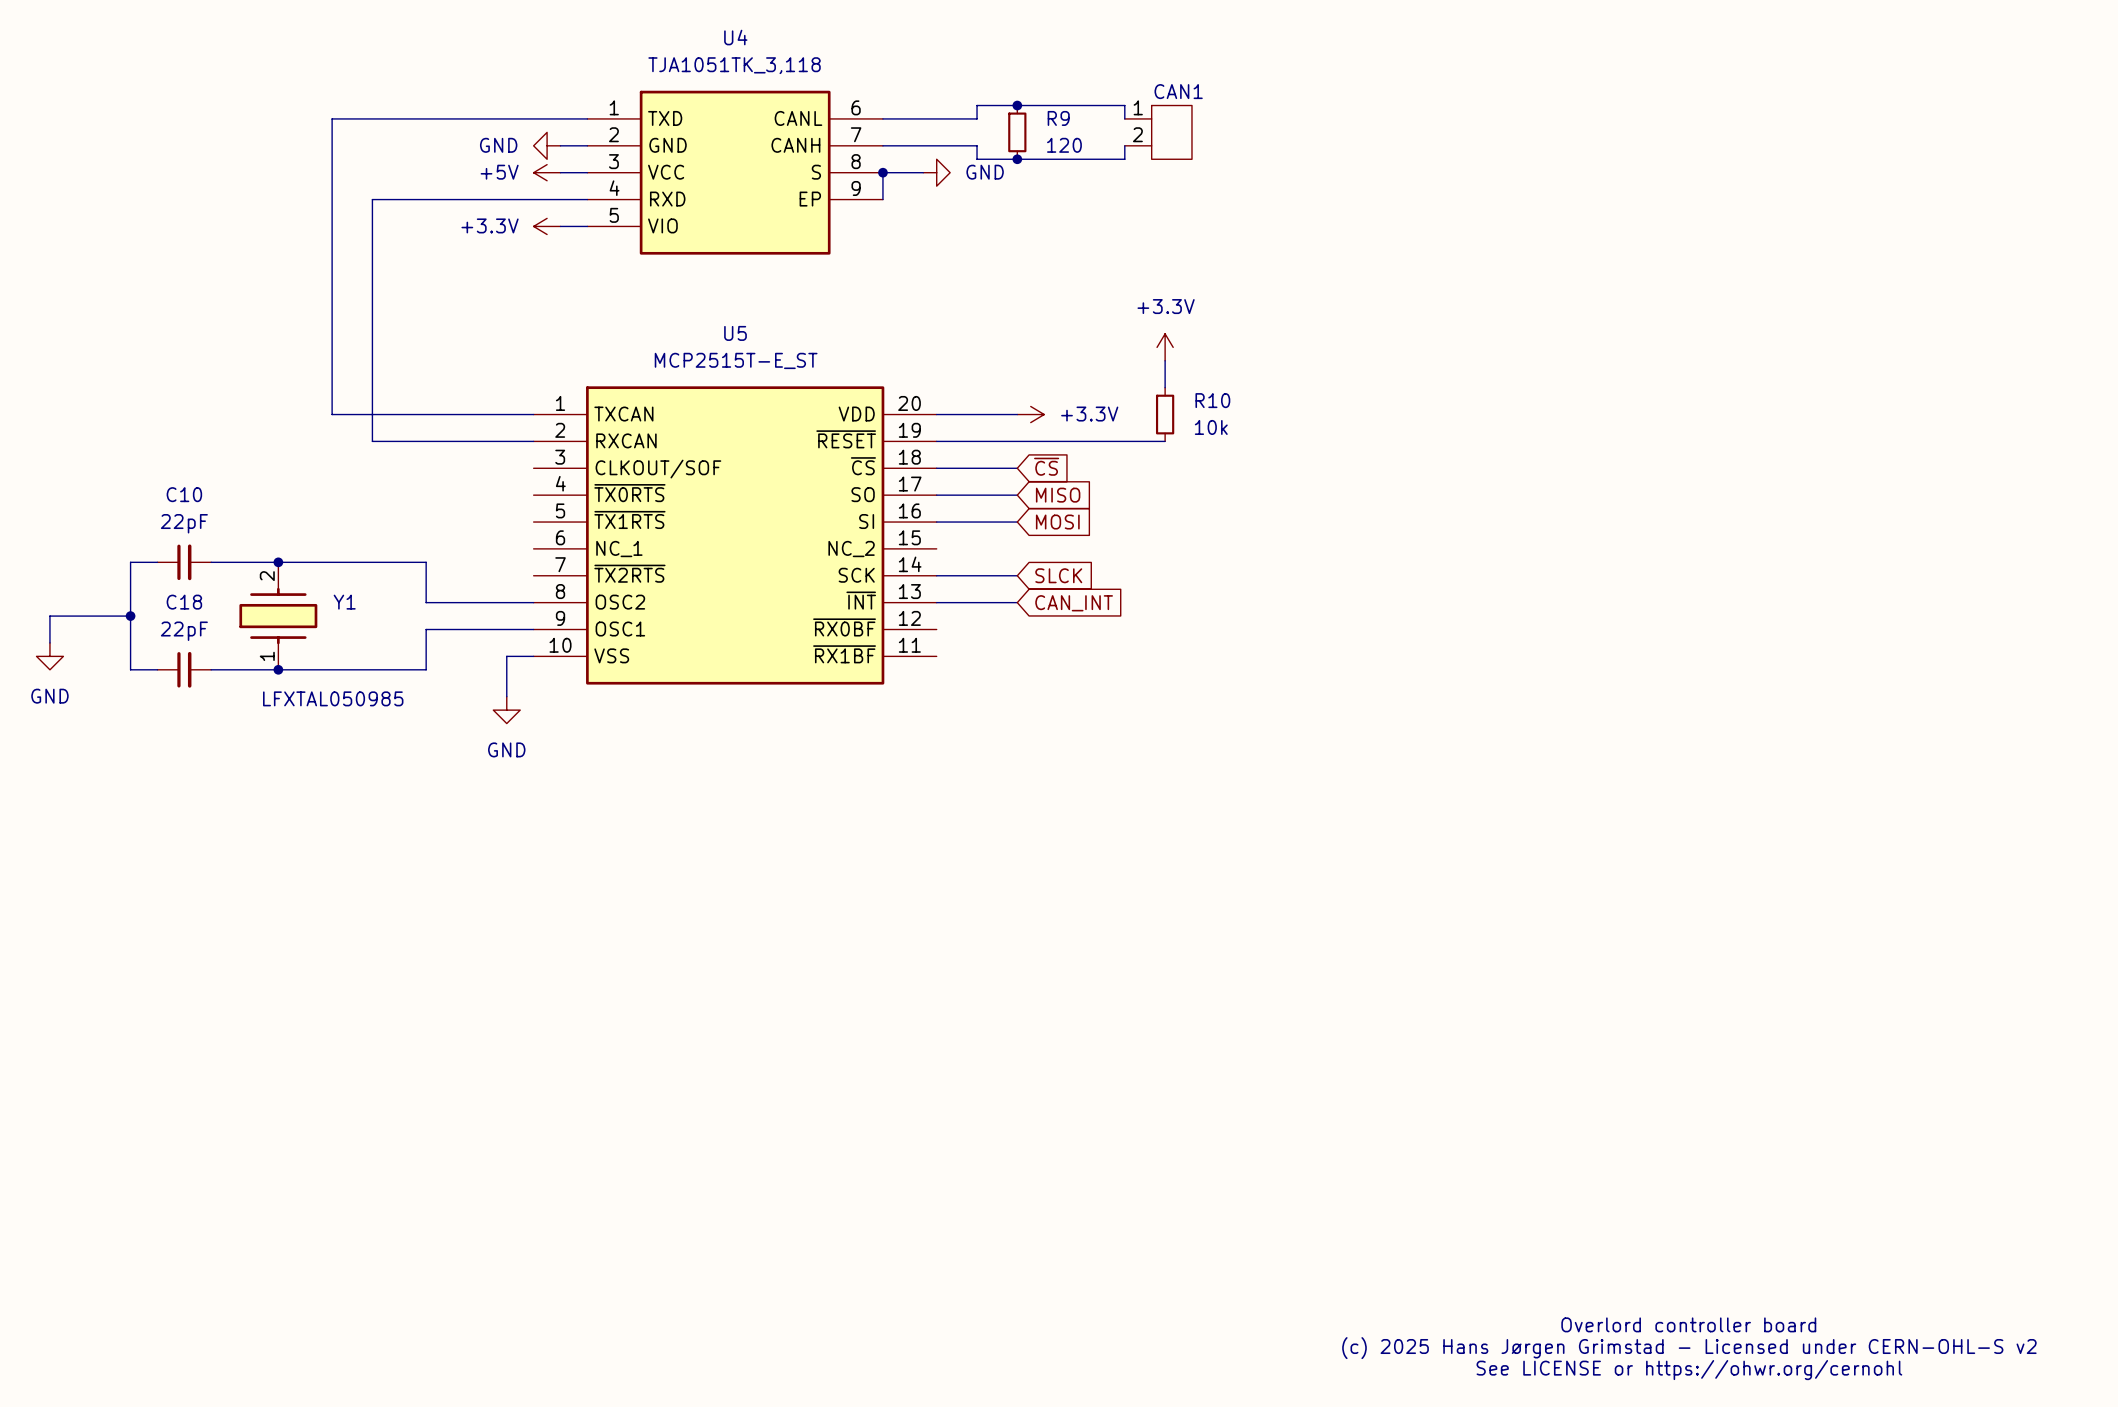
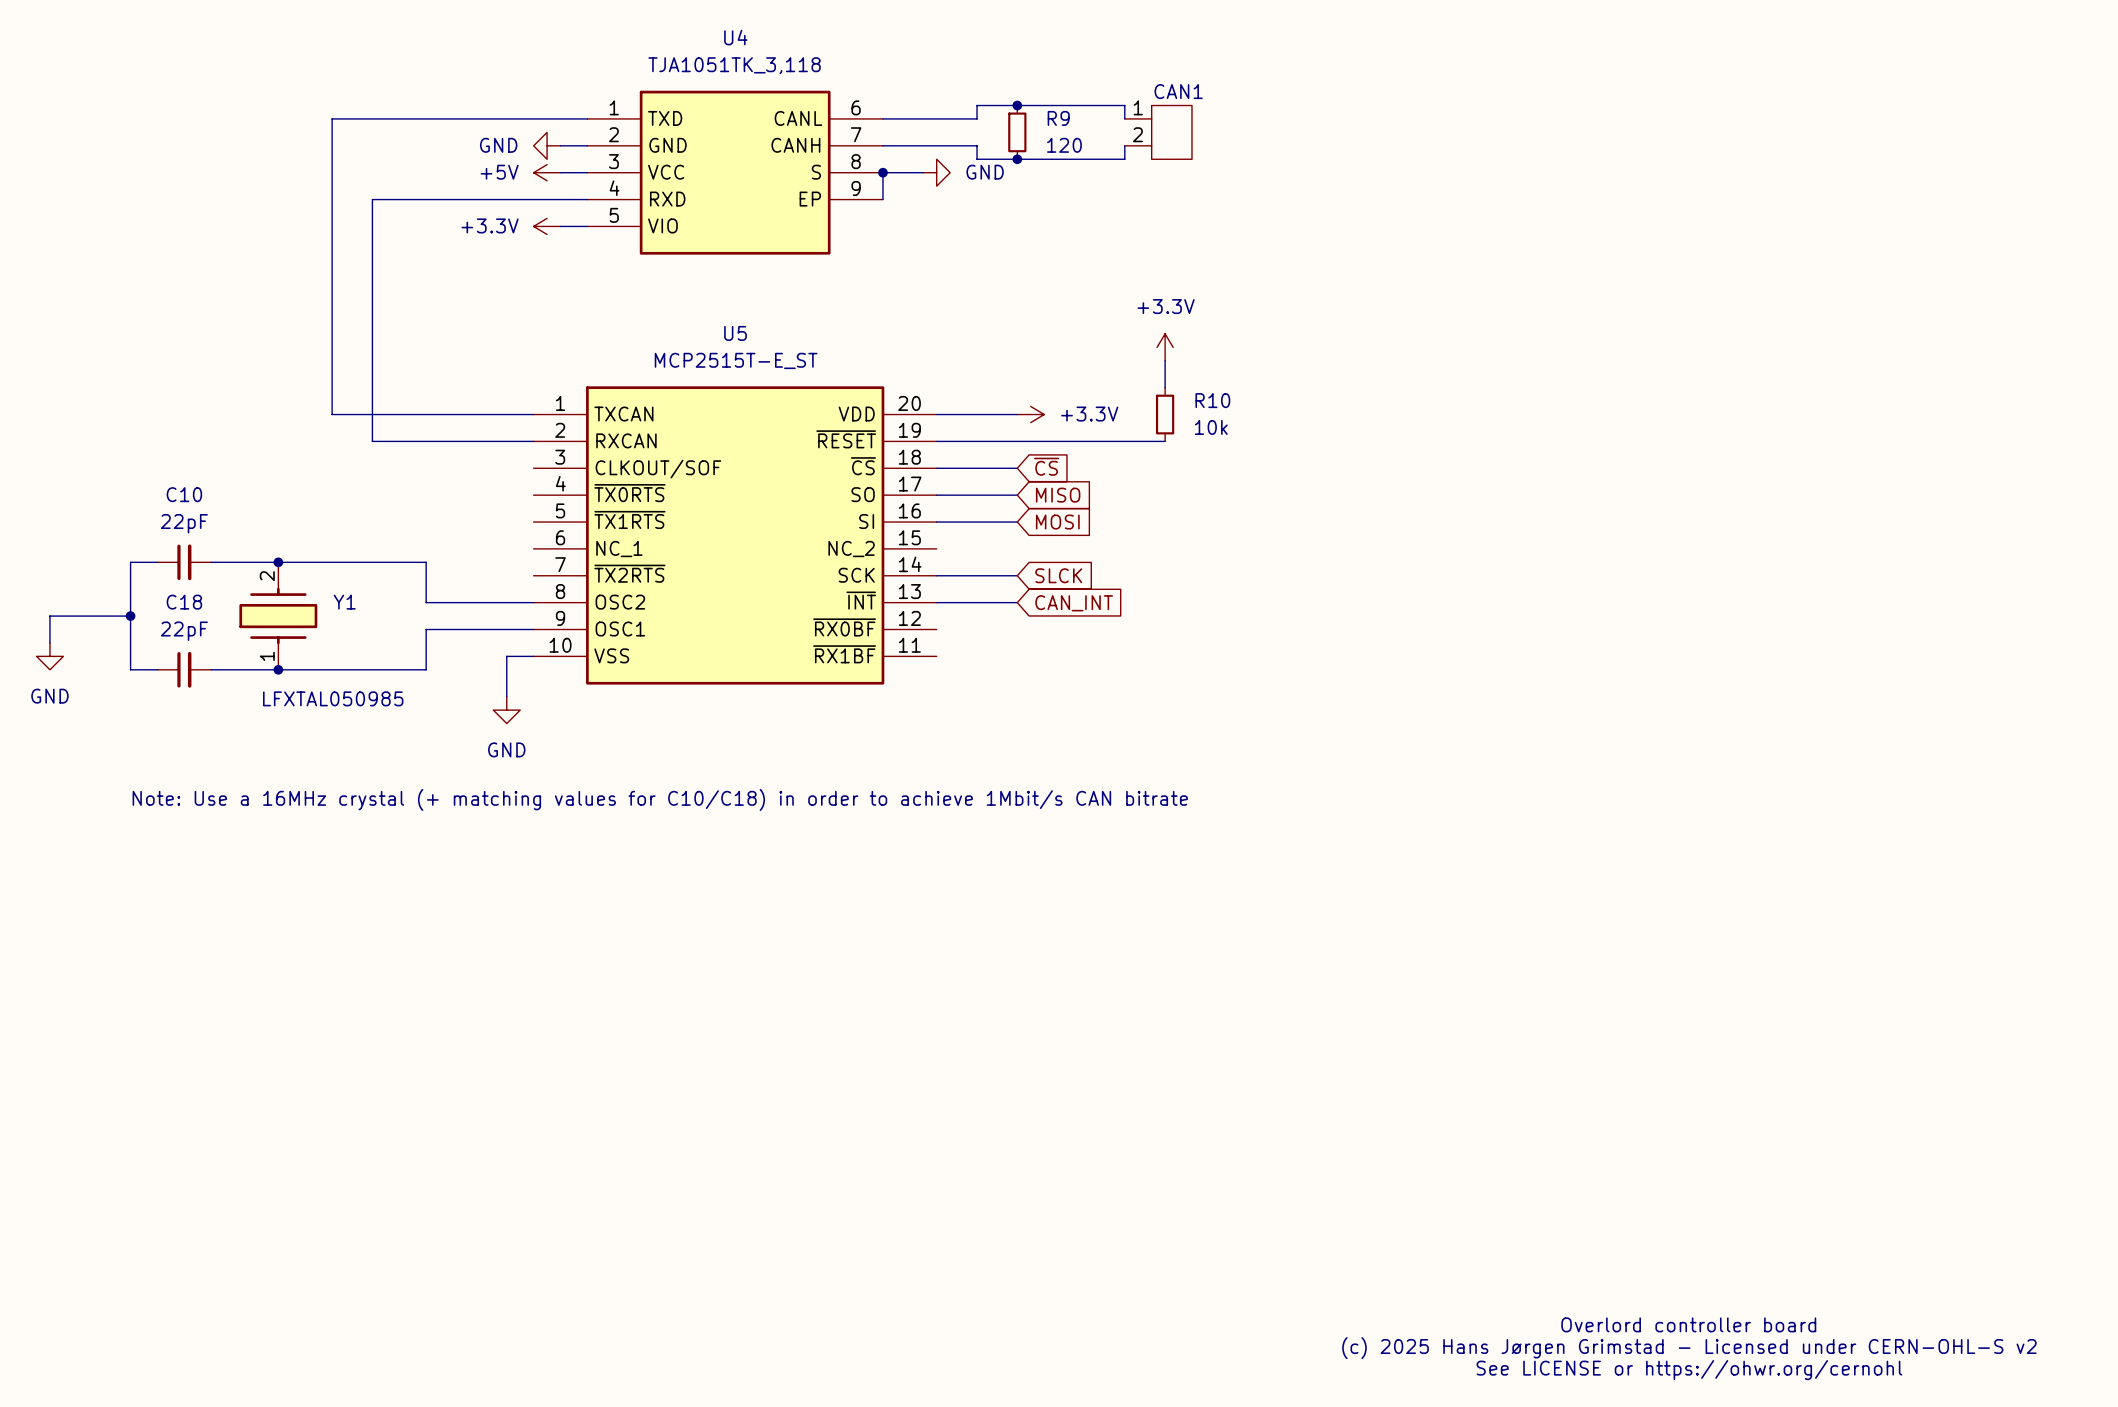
text: none -> Note: Use a 16MHz crystal (+ matching values for C10/C18) in order to achieve 1Mbit/s CAN bitrate (660, 799)

